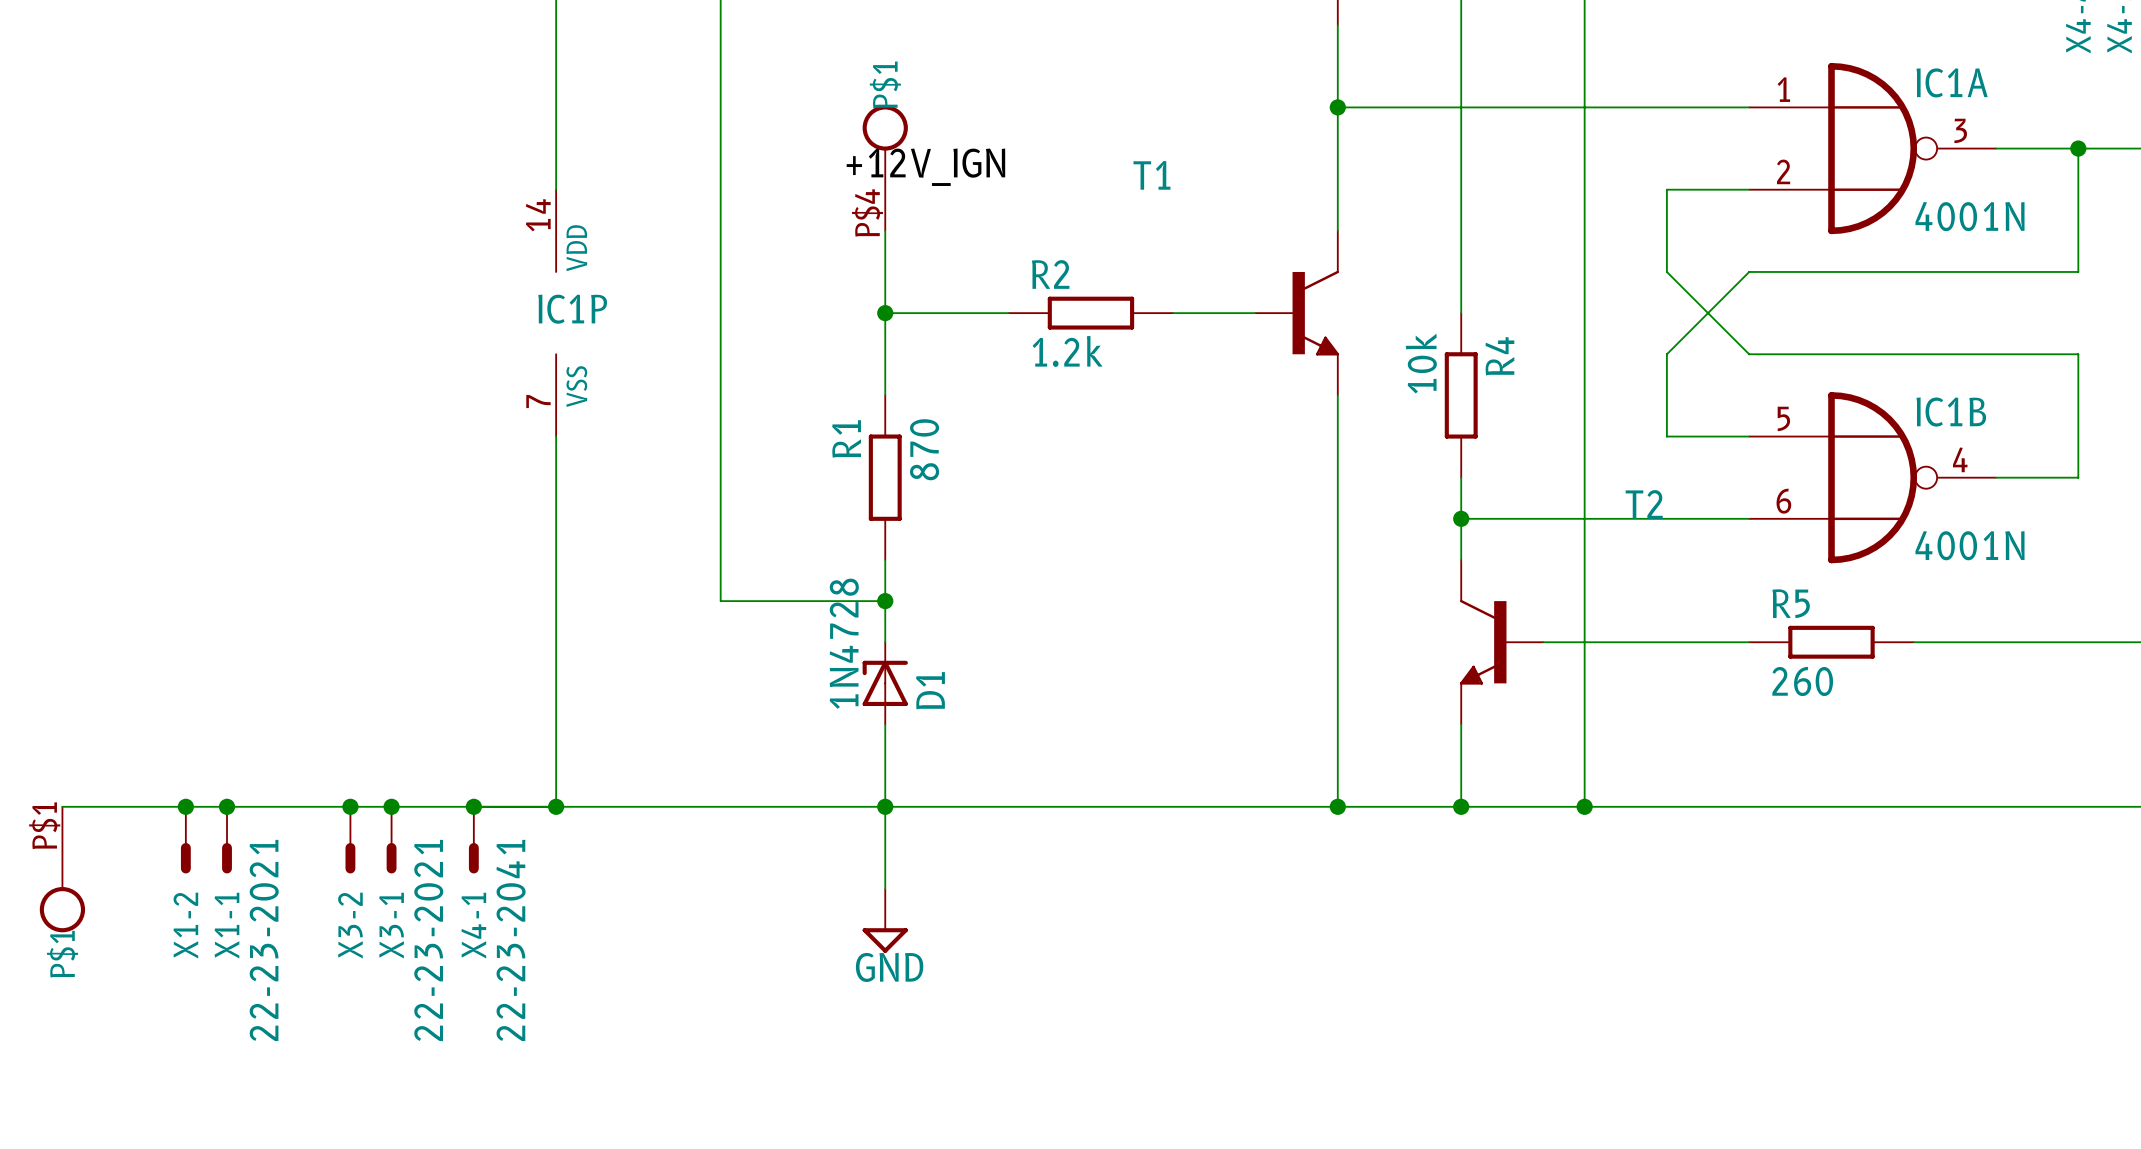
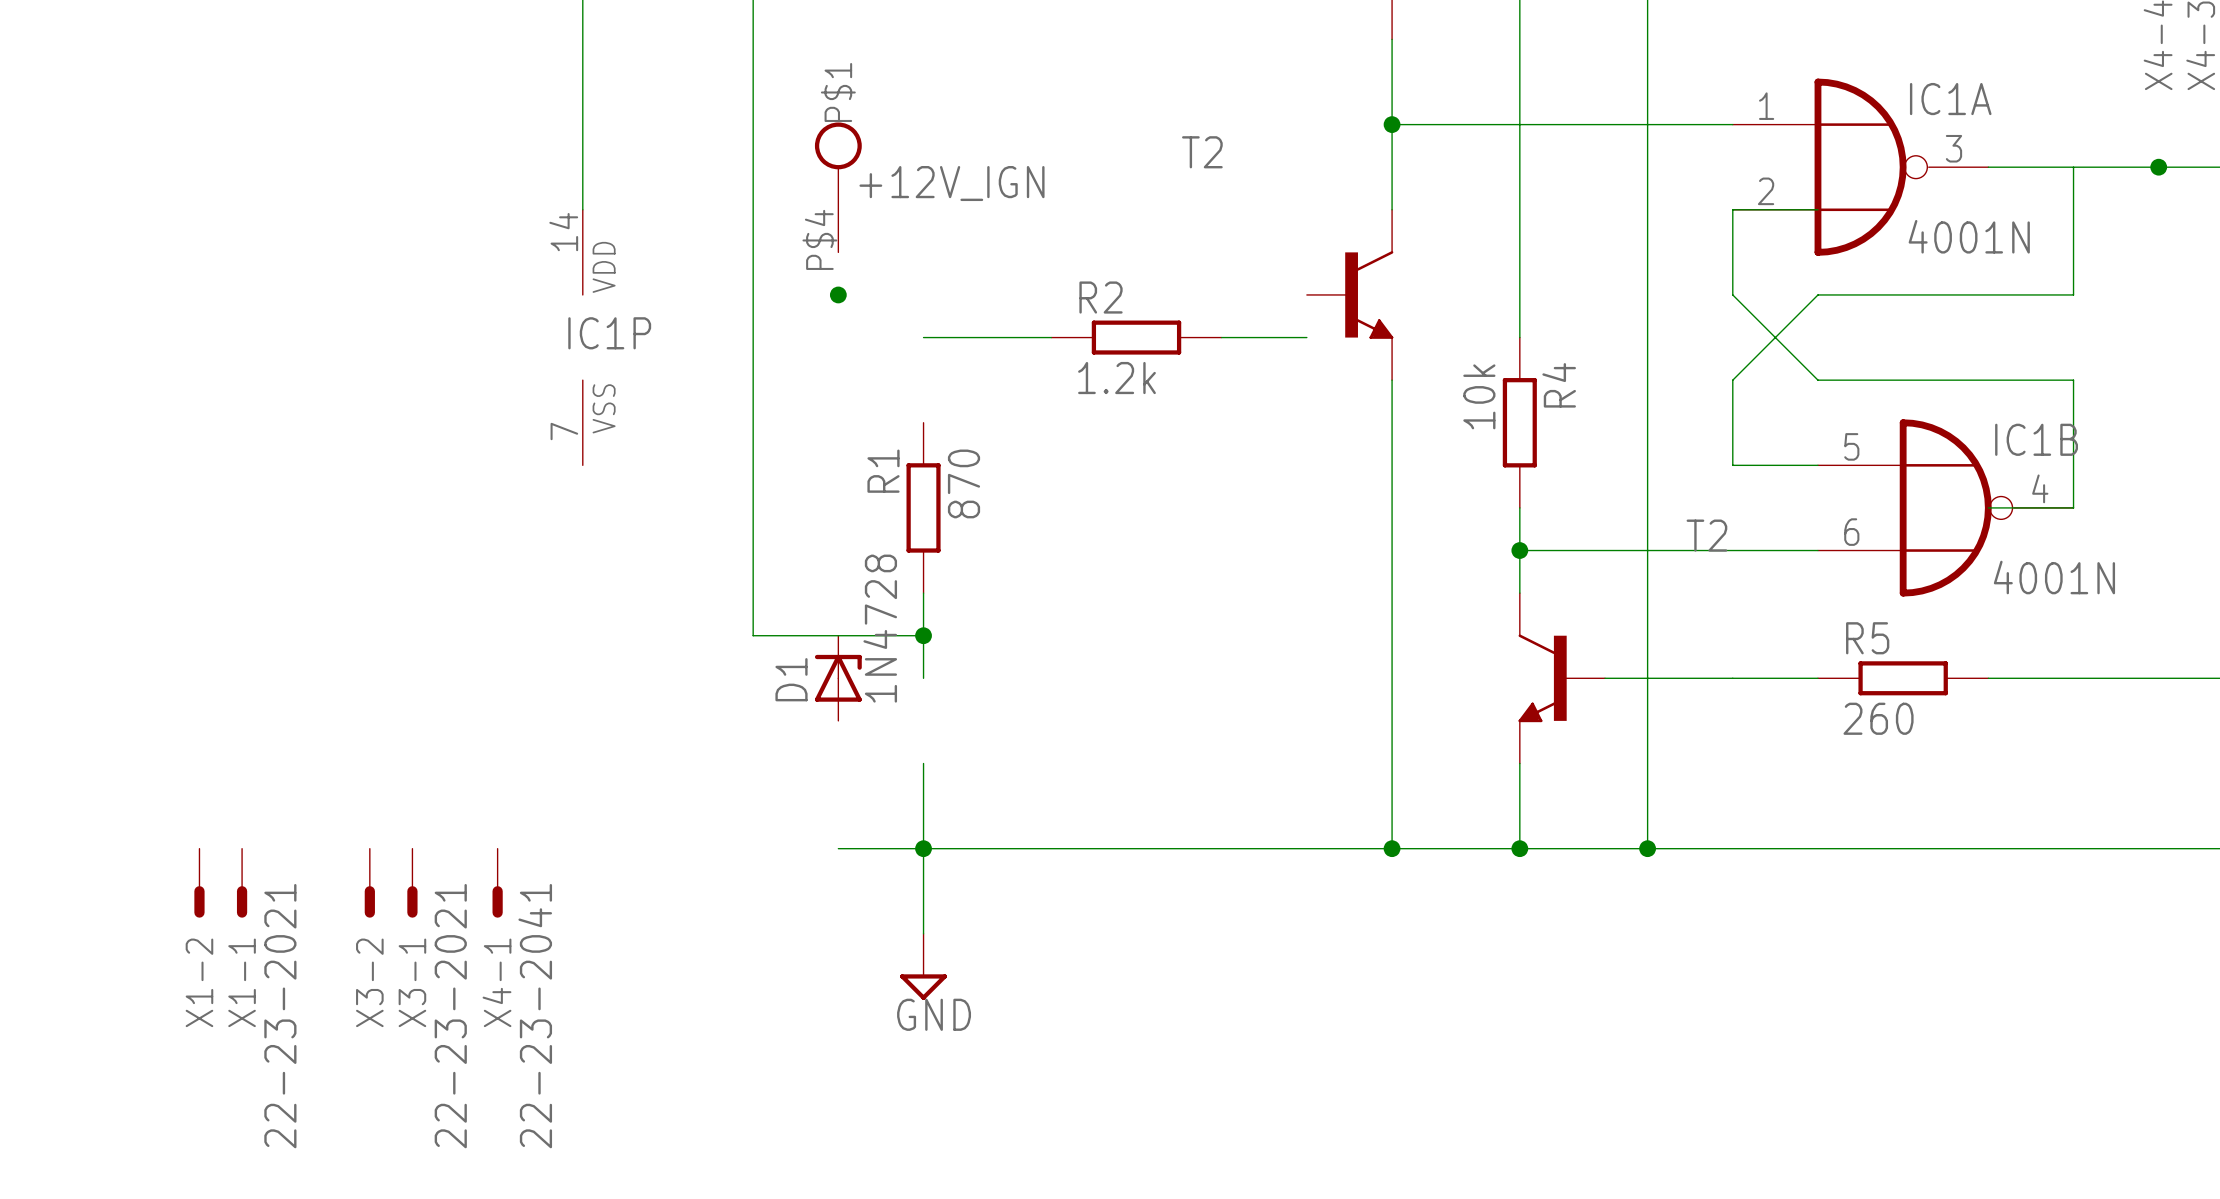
IC1A position: (1872, 148) -> (1860, 167)
wire: (2078, 148) (2078, 271) (1996, 271) -> (1988, 167) (2073, 167) (2073, 294)
part position: (885, 168) -> (838, 187)
wire: (885, 230) (885, 395) -> none
T2: none -> (1350, 294)
junction position: (885, 313) -> (838, 294)
T1: (1297, 313) -> none
wire: (1996, 354) (2078, 354) (2078, 477) (1996, 477) -> (2073, 380) (2073, 507) (1988, 507)
wire: (556, 436) (556, 806) -> none
D1 flip: as is (885, 683) -> left-right (838, 678)
D1 position: (885, 683) -> (838, 678)
wire: (62, 806) (802, 806) -> none
junction: (185, 806) -> none
junction: (227, 806) -> none
junction: (350, 806) -> none
junction: (391, 806) -> none
junction: (473, 806) -> none
junction: (556, 806) -> none
part: (62, 869) -> none

